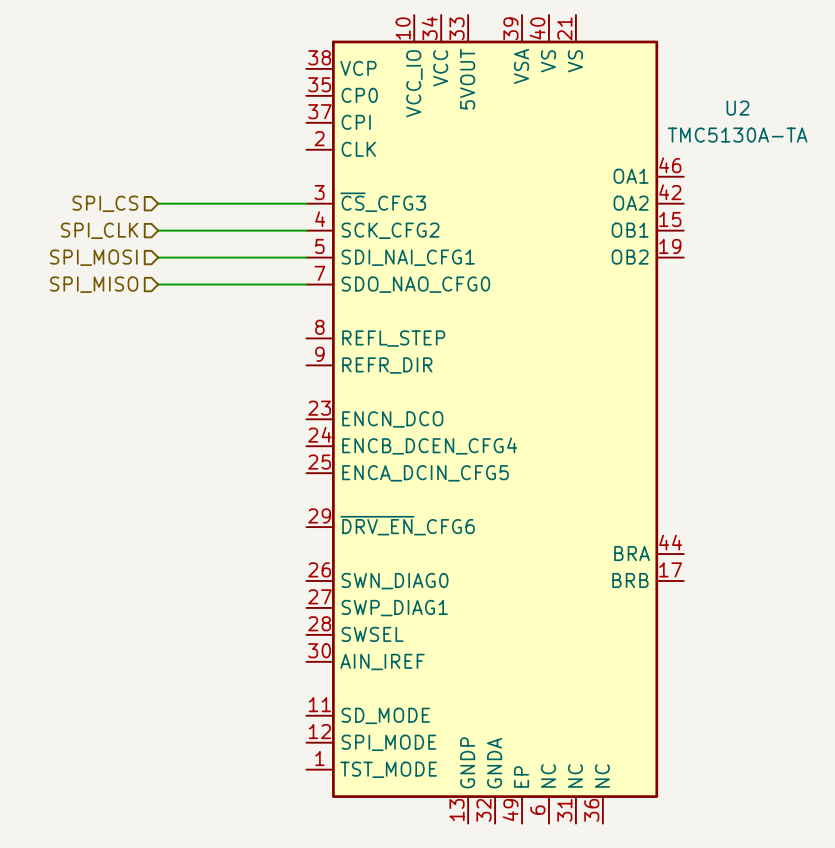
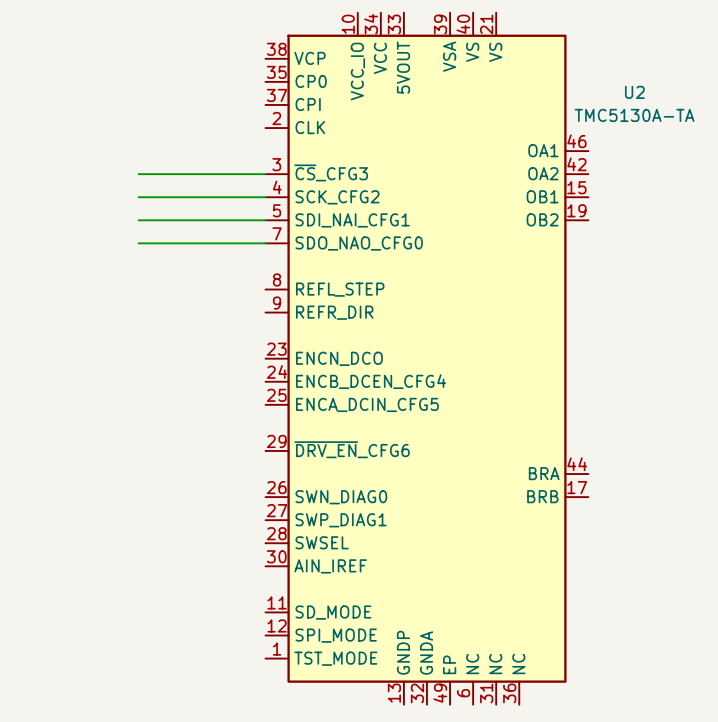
hierarchical label: SPI_CS (105, 203) -> none
hierarchical label: SPI_CLK (99, 230) -> none
hierarchical label: SPI_MOSI (93, 257) -> none
hierarchical label: SPI_MISO (94, 284) -> none

